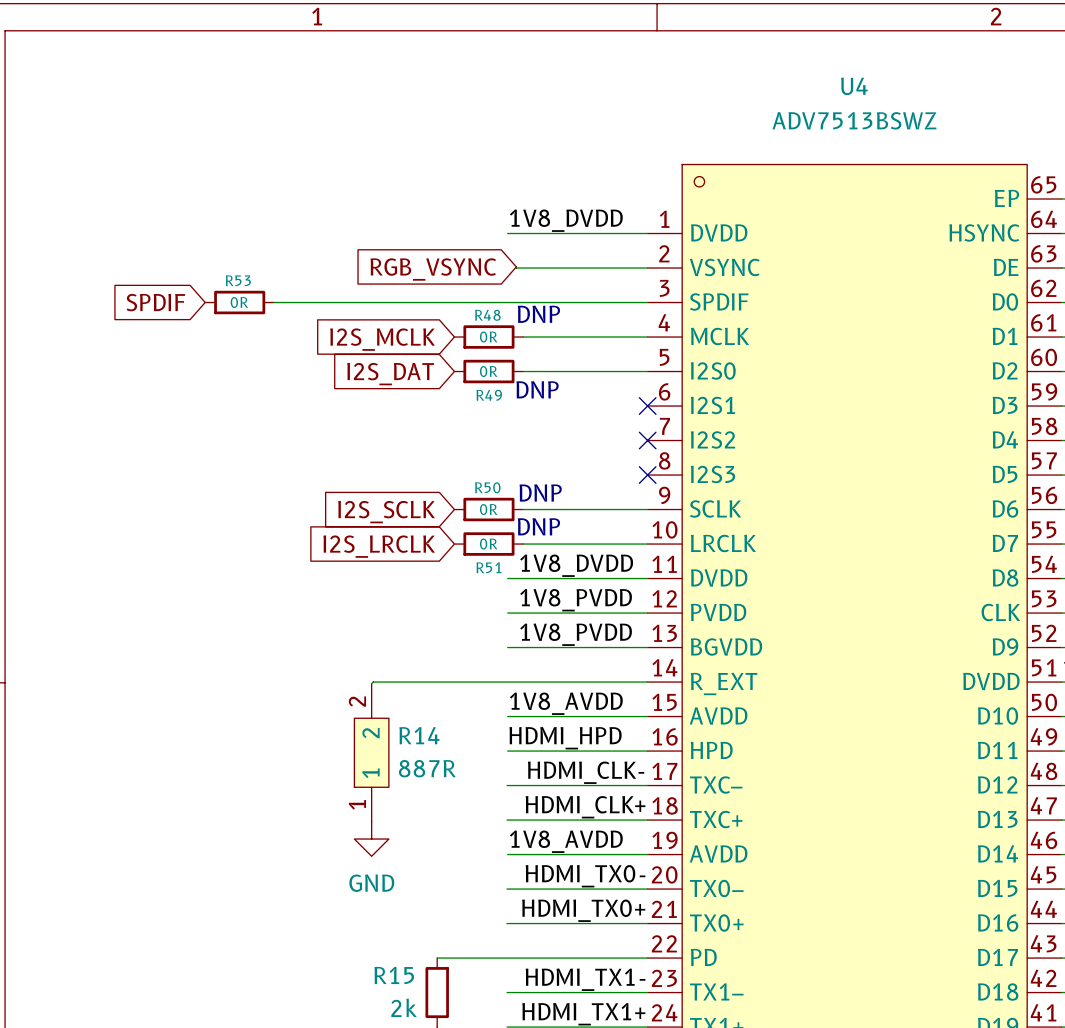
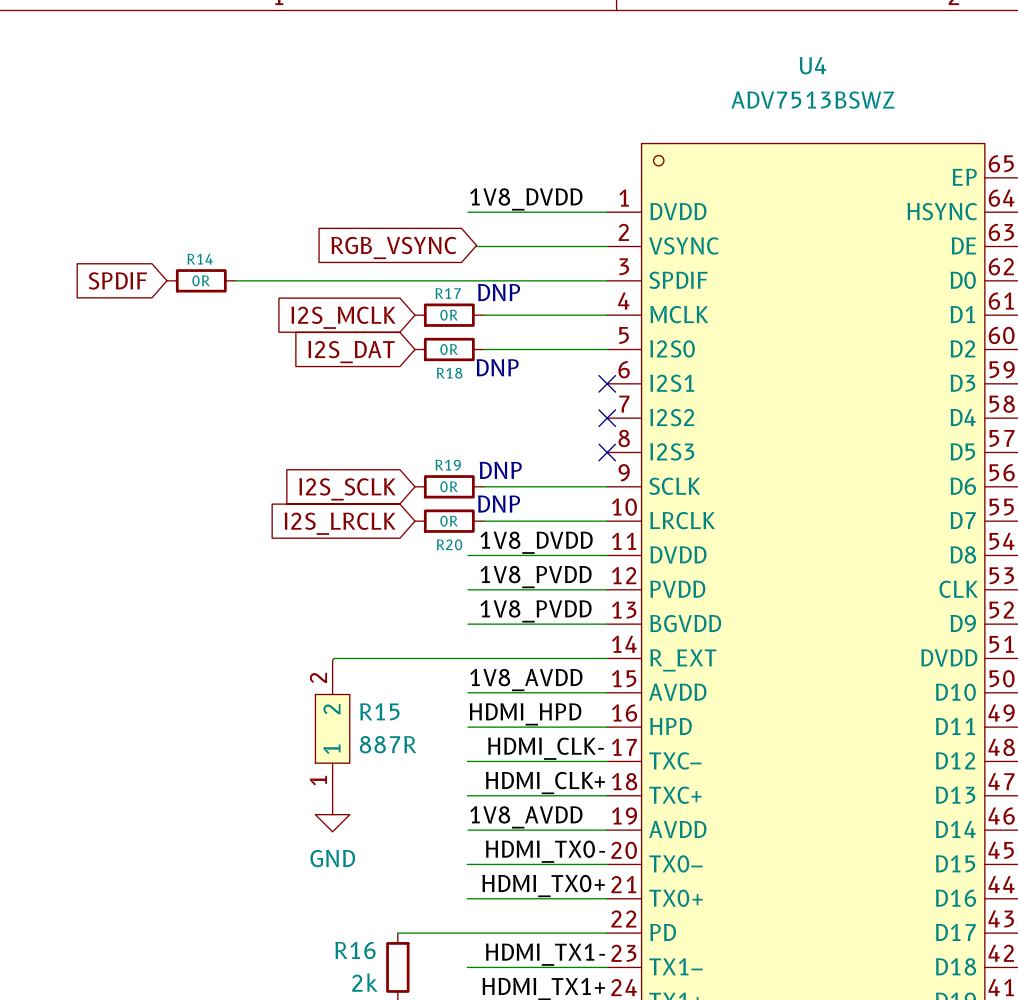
R53 name: R53 (238, 280) -> R14 (200, 259)
R48 name: R48 (487, 315) -> R17 (448, 293)
R49 name: R49 (489, 395) -> R18 (449, 373)
R50 name: R50 (487, 487) -> R19 (448, 465)
R51 name: R51 (488, 567) -> R20 (449, 544)
R14 name: R14 (419, 735) -> R15 (379, 711)
R15 name: R15 (394, 975) -> R16 (355, 950)

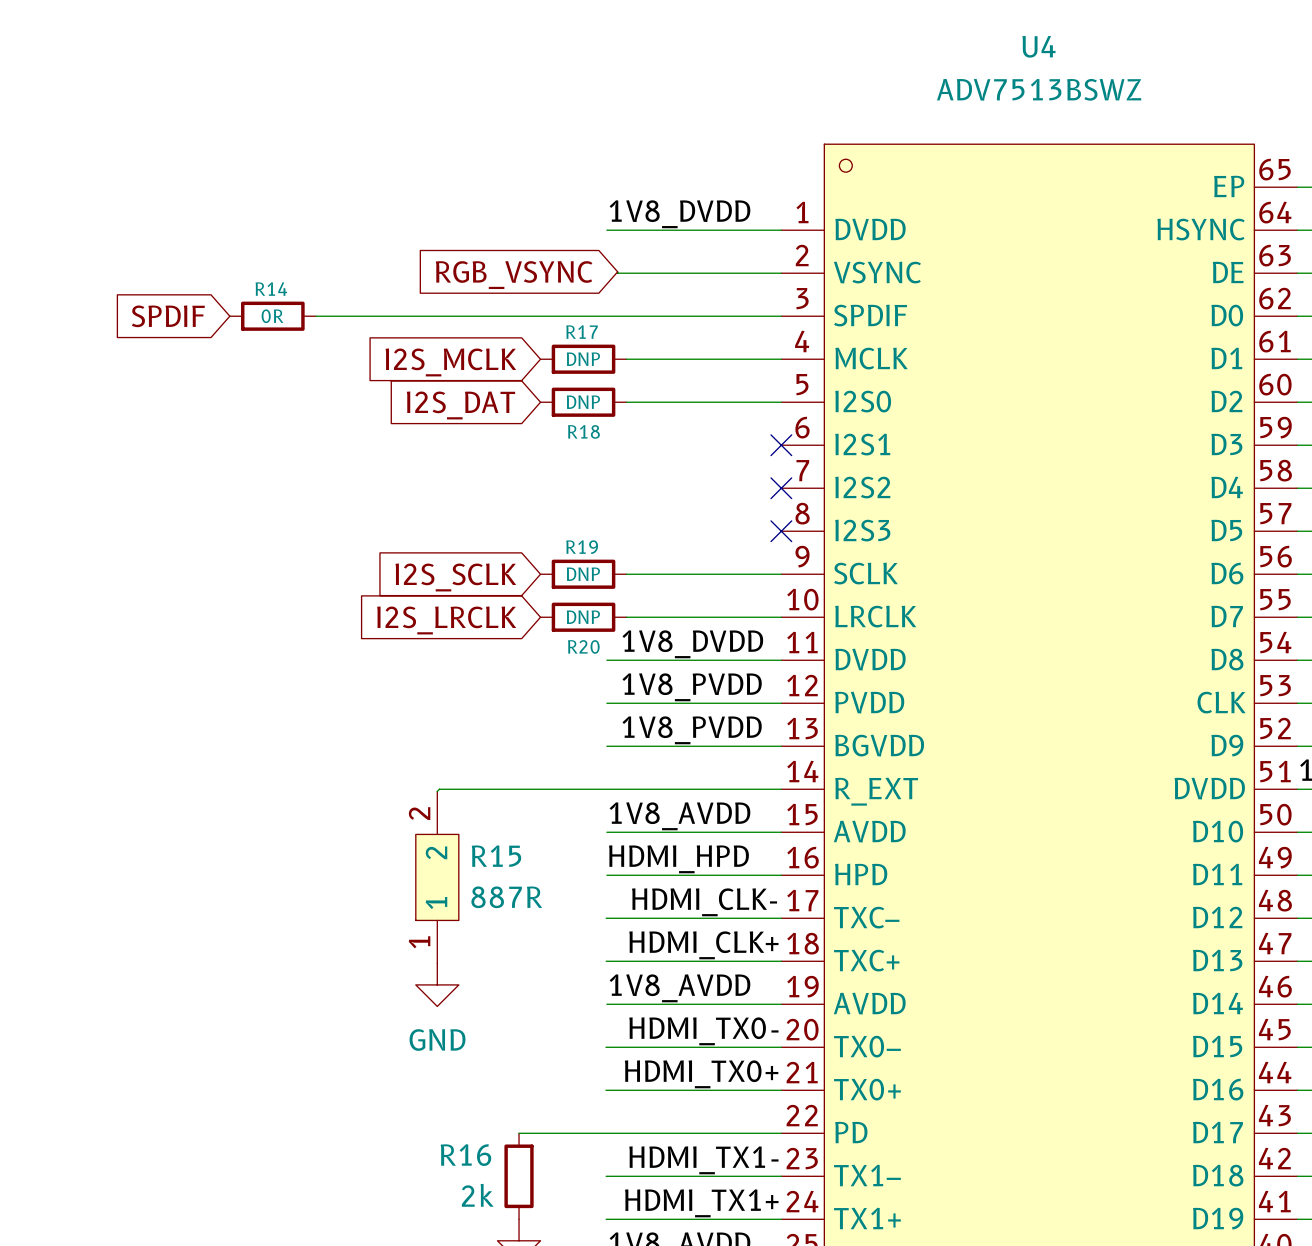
text: DNP (499, 292) -> none
R17 value: 0R (449, 315) -> DNP (583, 359)
R18 value: 0R (449, 349) -> DNP (583, 402)
text: DNP (497, 367) -> none
text: DNP (500, 470) -> none
R19 value: 0R (449, 486) -> DNP (583, 574)
text: DNP (499, 504) -> none
R20 value: 0R (449, 521) -> DNP (583, 617)

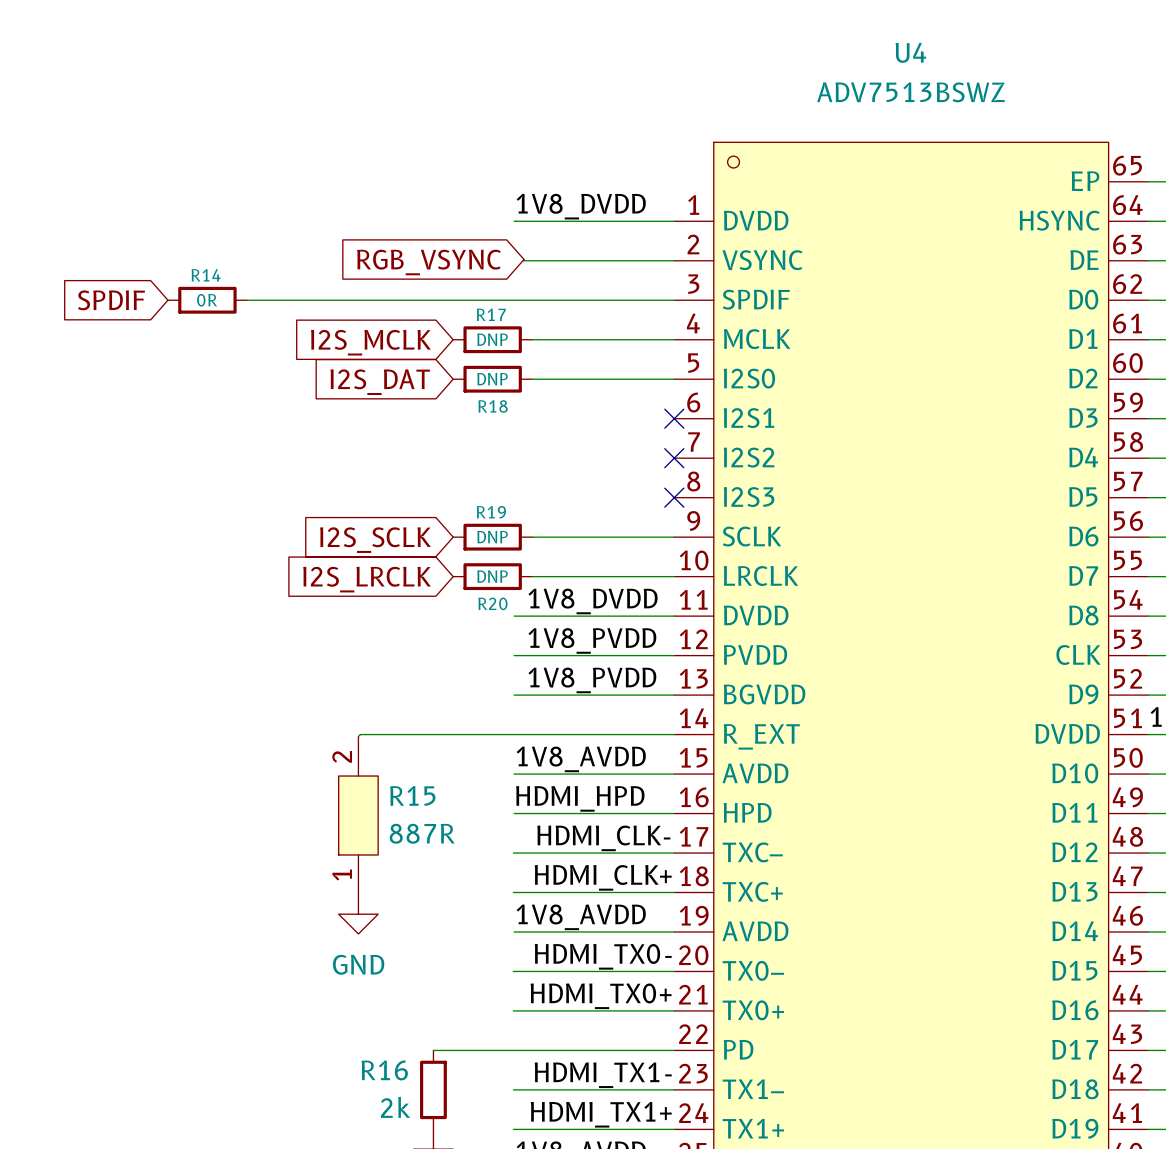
R15 pin name: 2 (436, 852) -> none
R15 pin name: 1 (436, 903) -> none

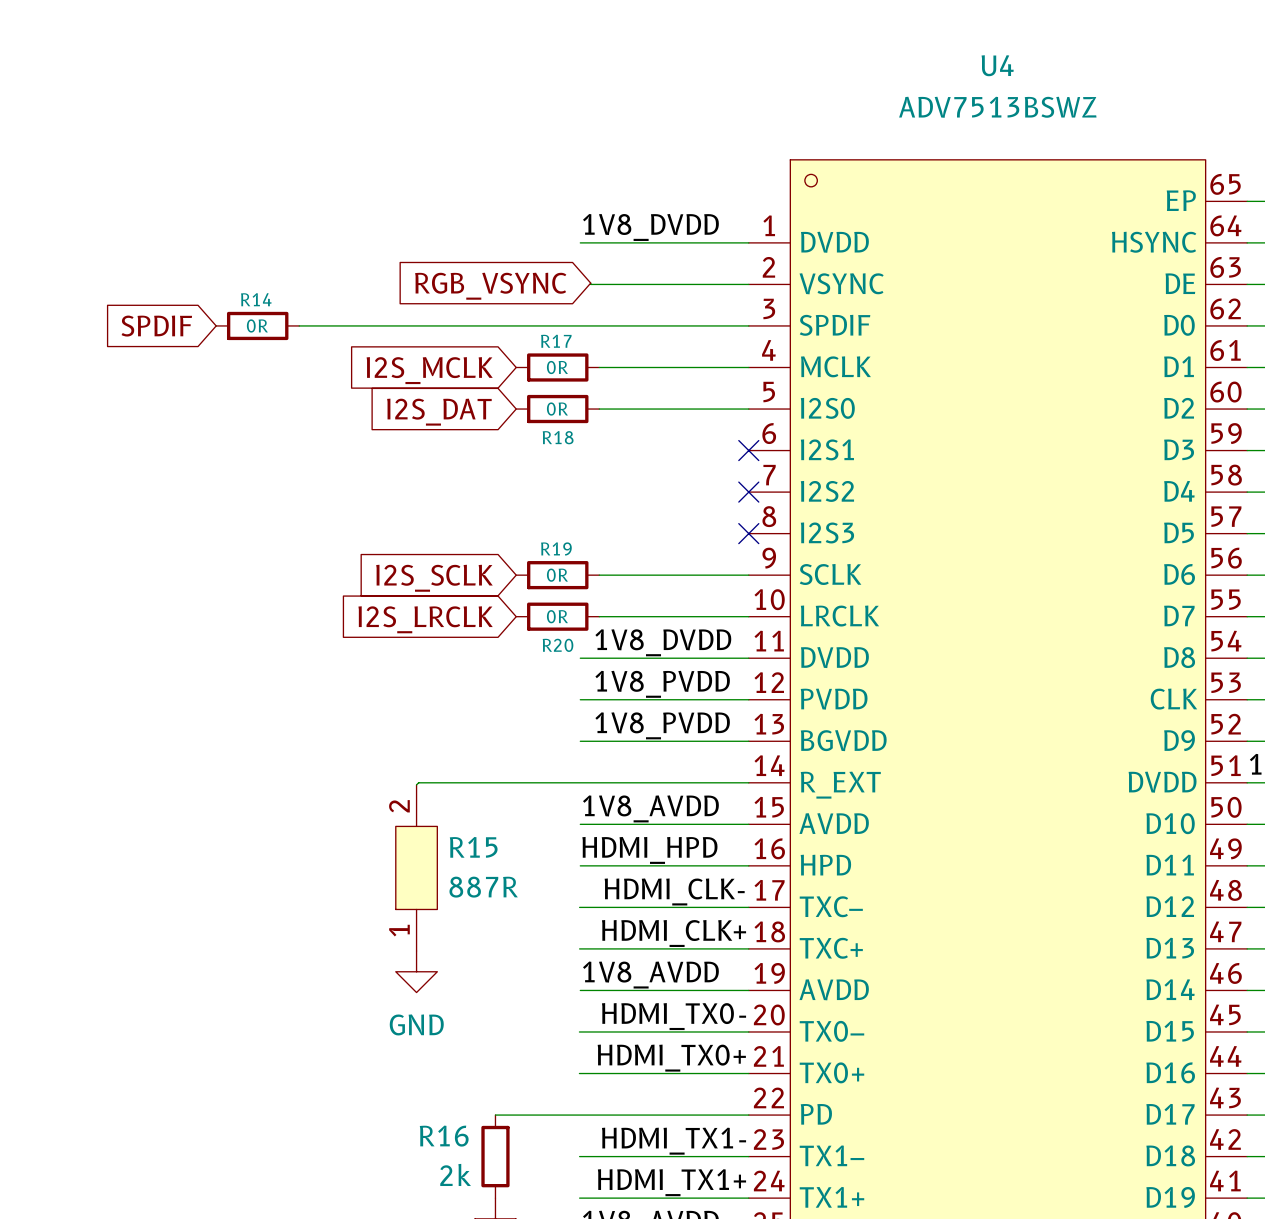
R17 value: DNP (492, 339) -> 0R (557, 367)
R18 value: DNP (492, 379) -> 0R (557, 409)
R19 value: DNP (492, 537) -> 0R (557, 575)
R20 value: DNP (492, 576) -> 0R (557, 616)

